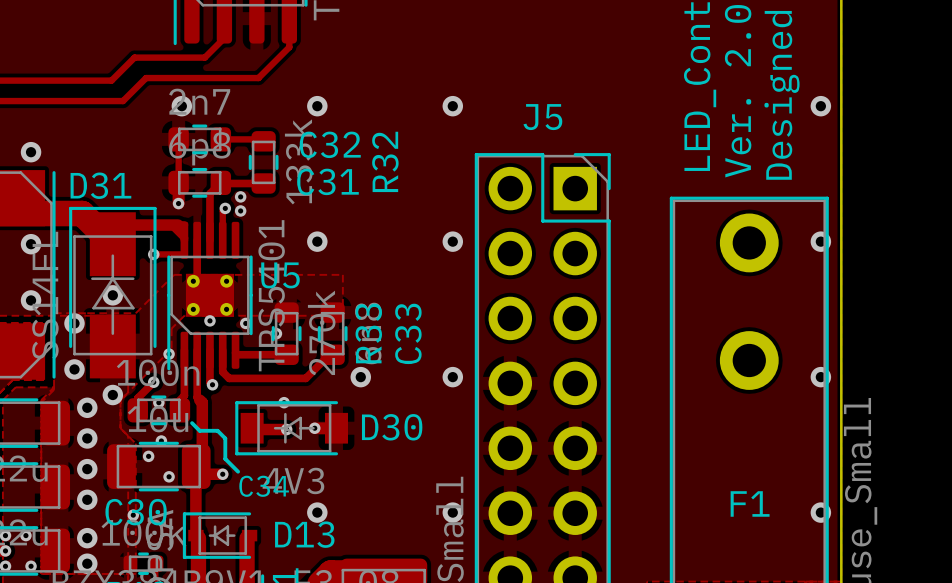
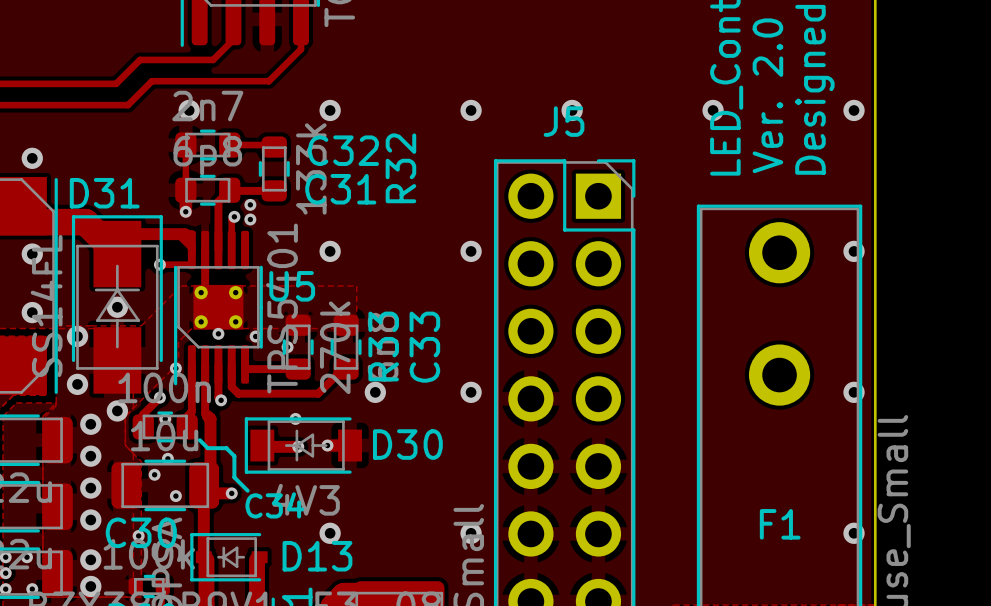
via: none -> (572, 110)
via: none -> (713, 110)

